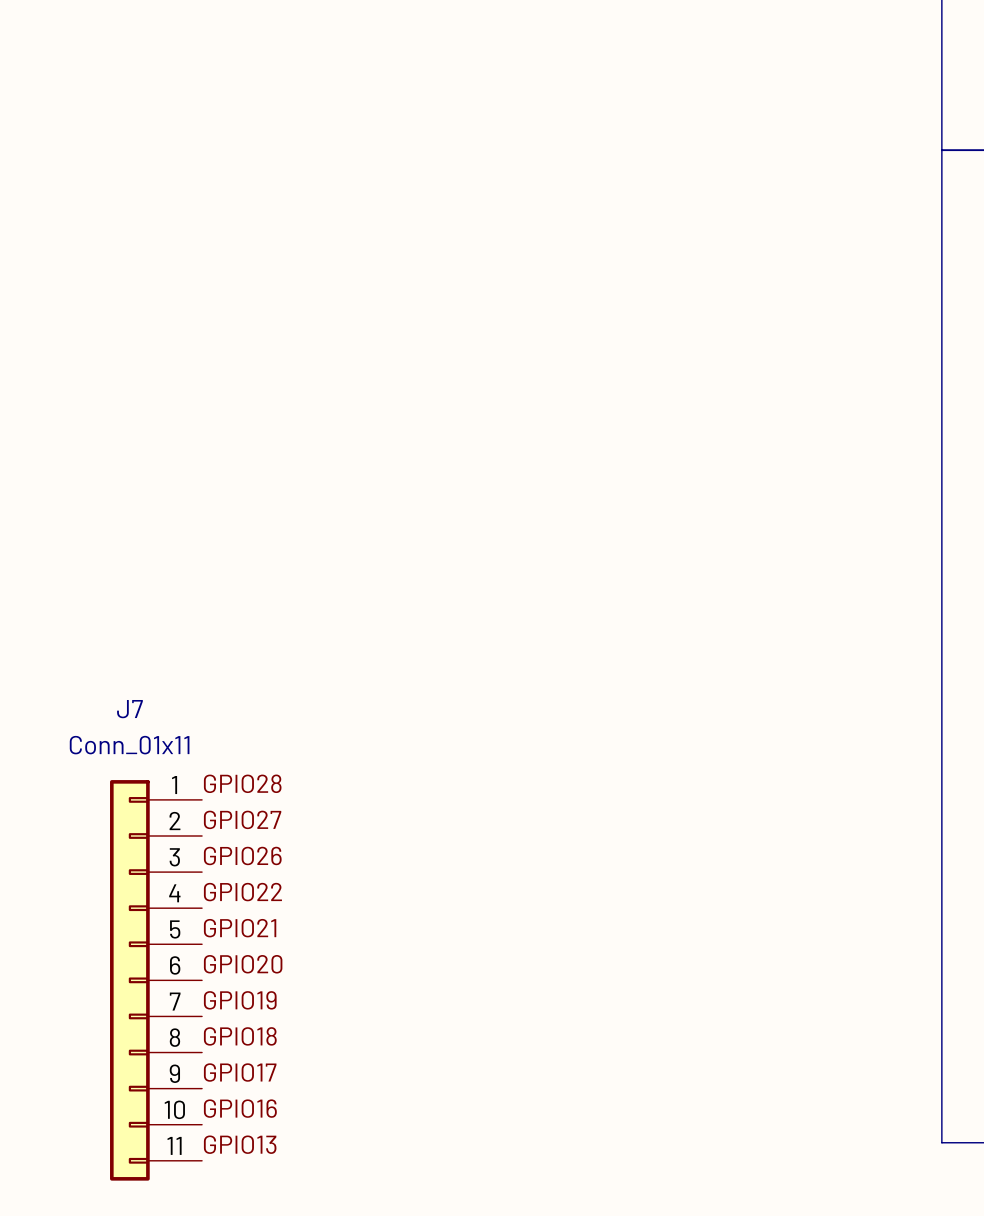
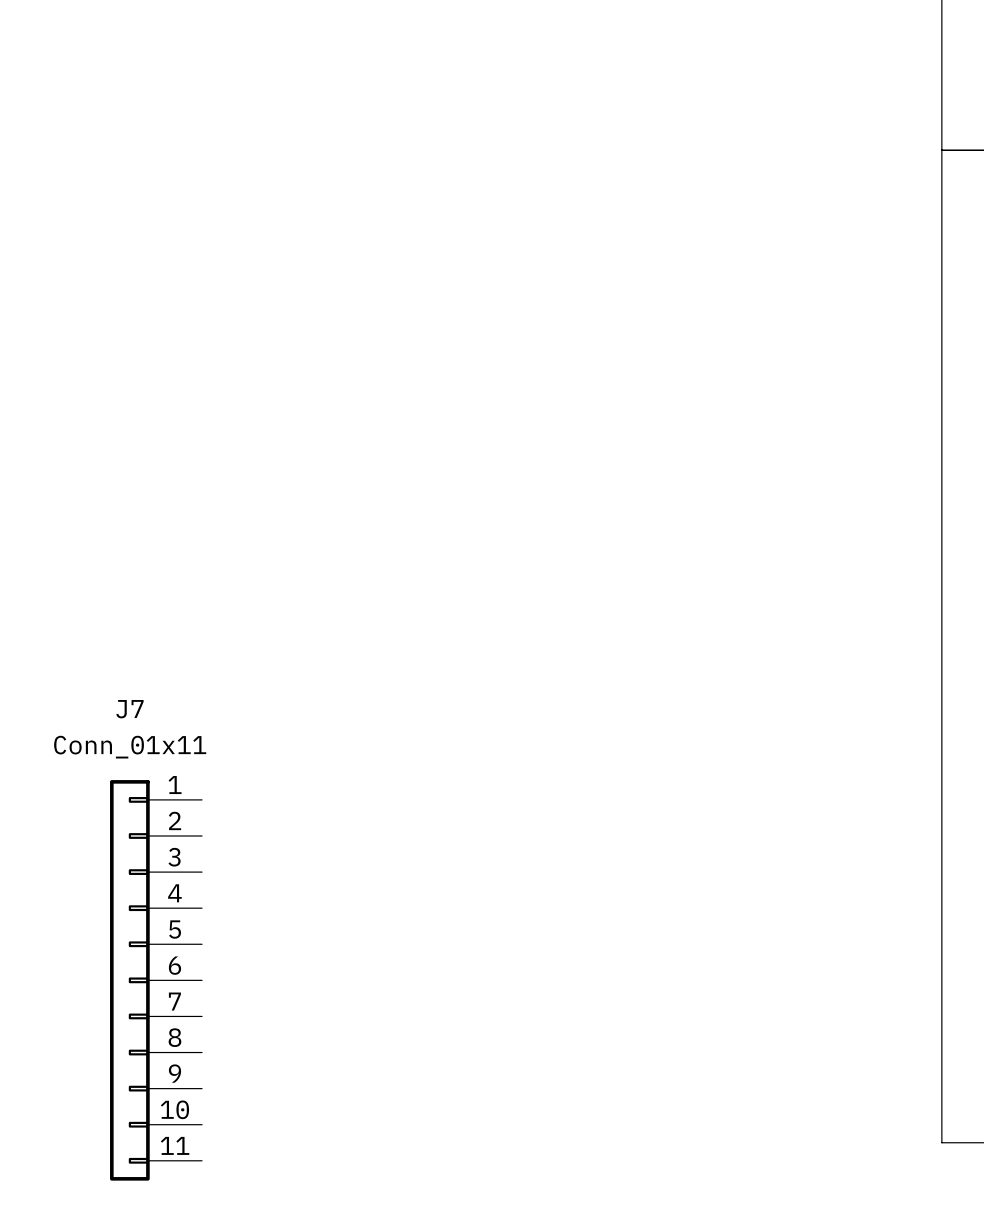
label: GPIO28 (242, 783) -> none
label: GPIO27 (242, 819) -> none
label: GPIO26 (242, 855) -> none
label: GPIO22 (242, 892) -> none
label: GPIO21 (240, 928) -> none
label: GPIO20 (243, 964) -> none
label: GPIO19 (240, 1000) -> none
label: GPIO18 (240, 1036) -> none
label: GPIO17 (240, 1072) -> none
label: GPIO16 (240, 1108) -> none
label: GPIO13 (240, 1144) -> none

